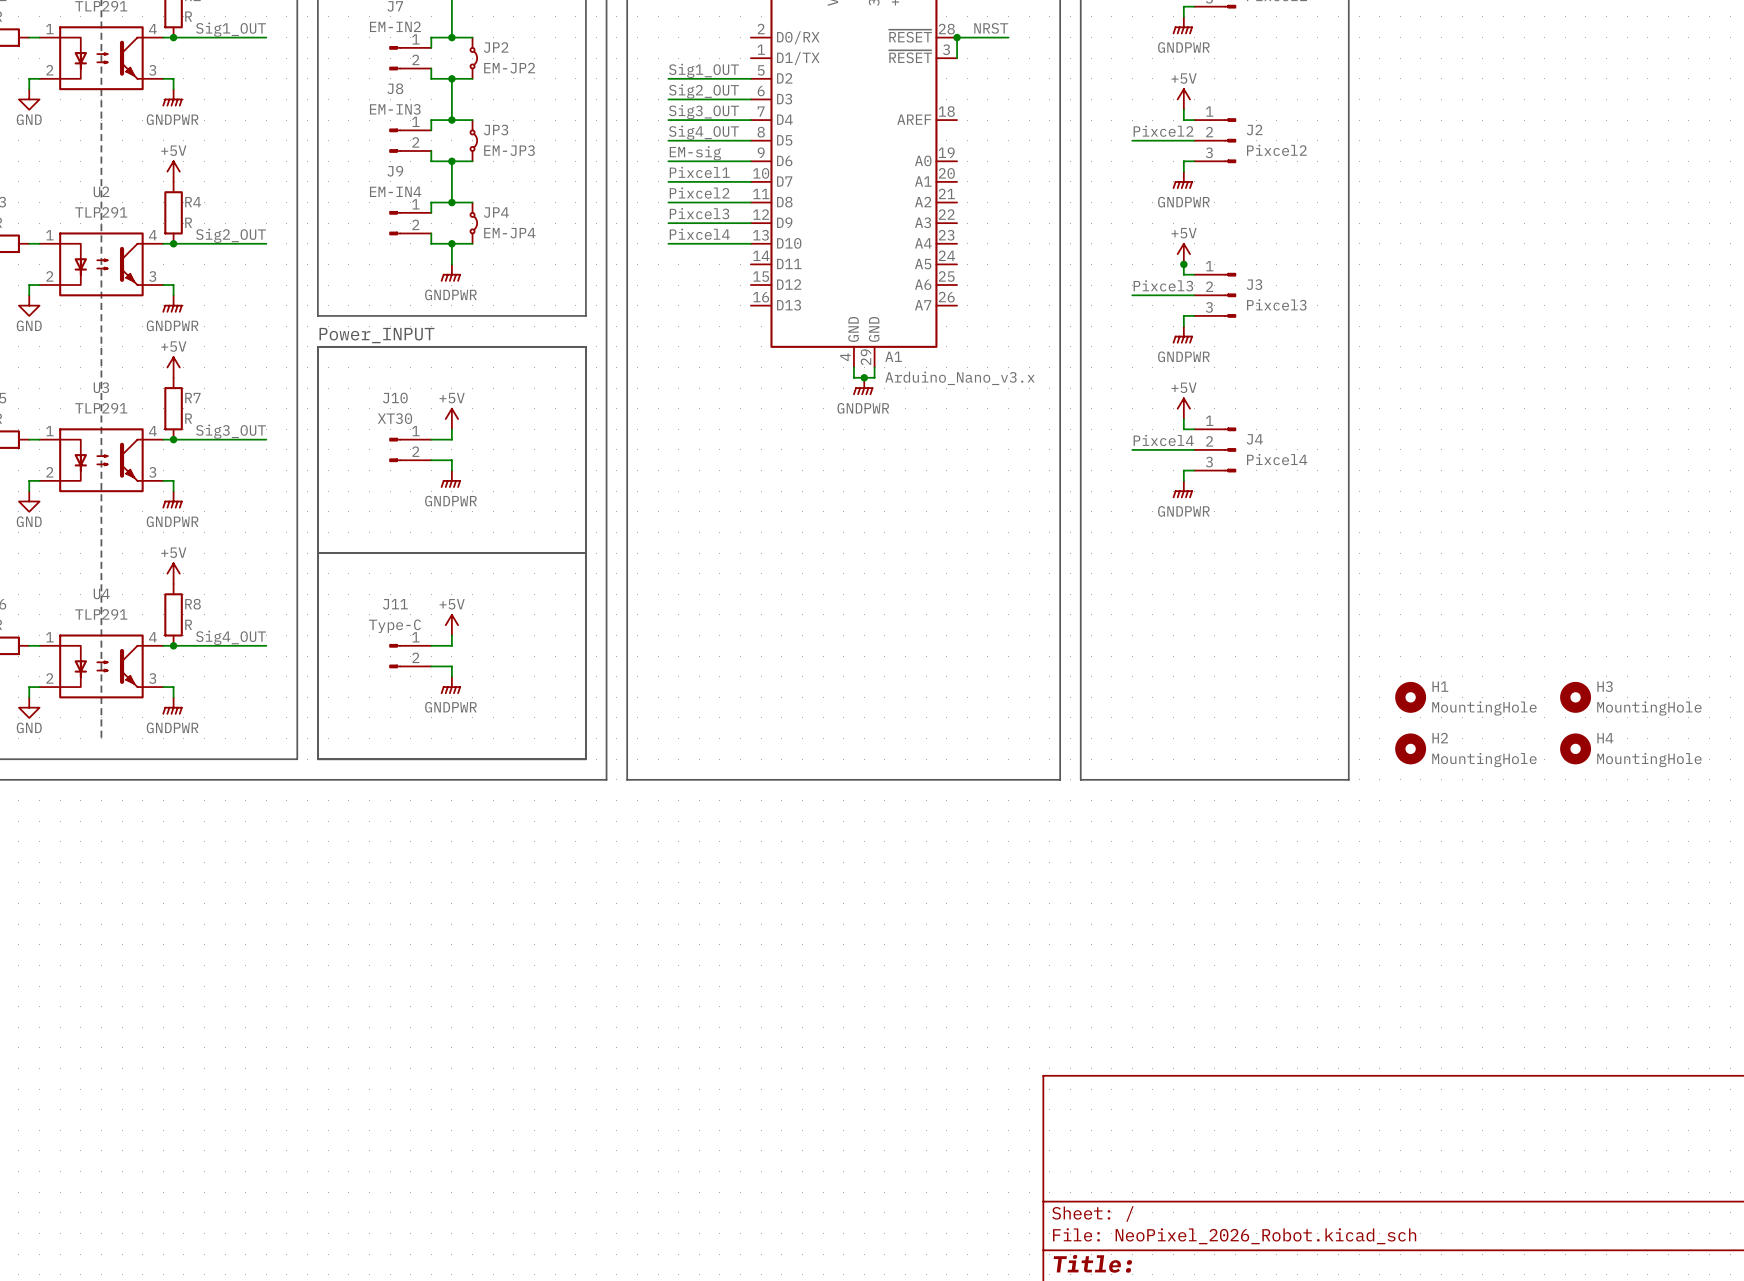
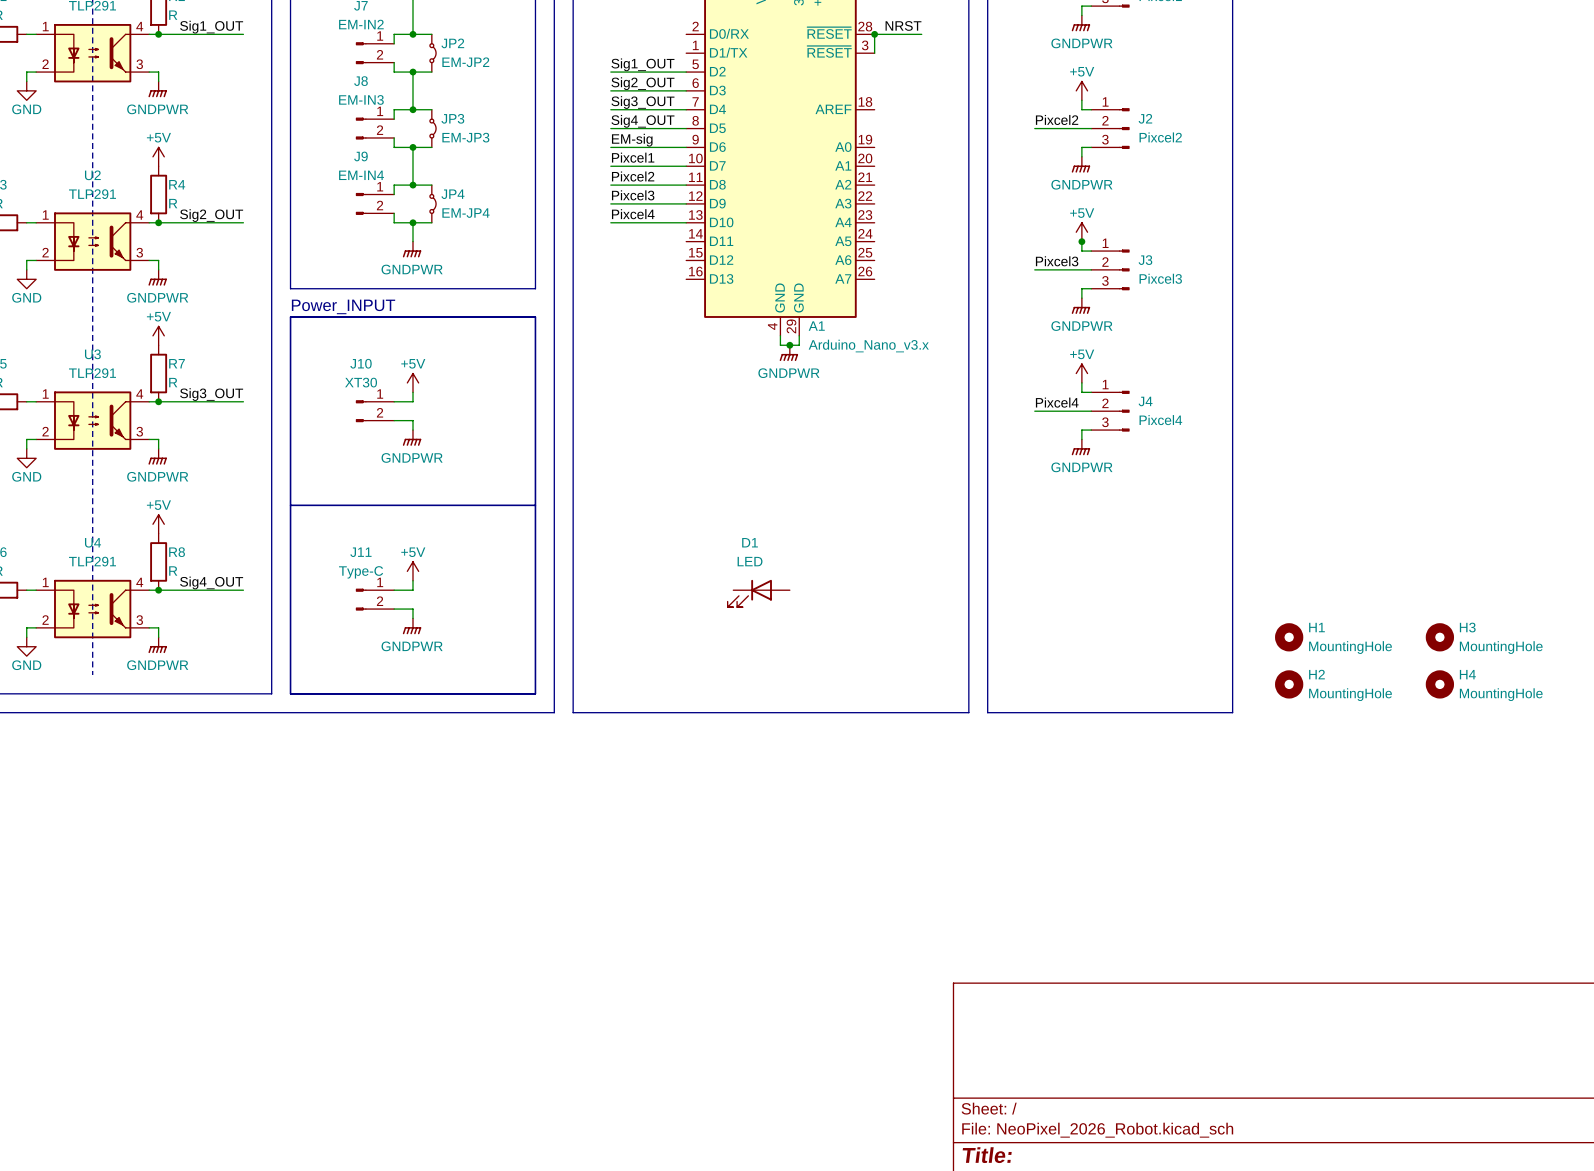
D1: none -> LED (758, 593)

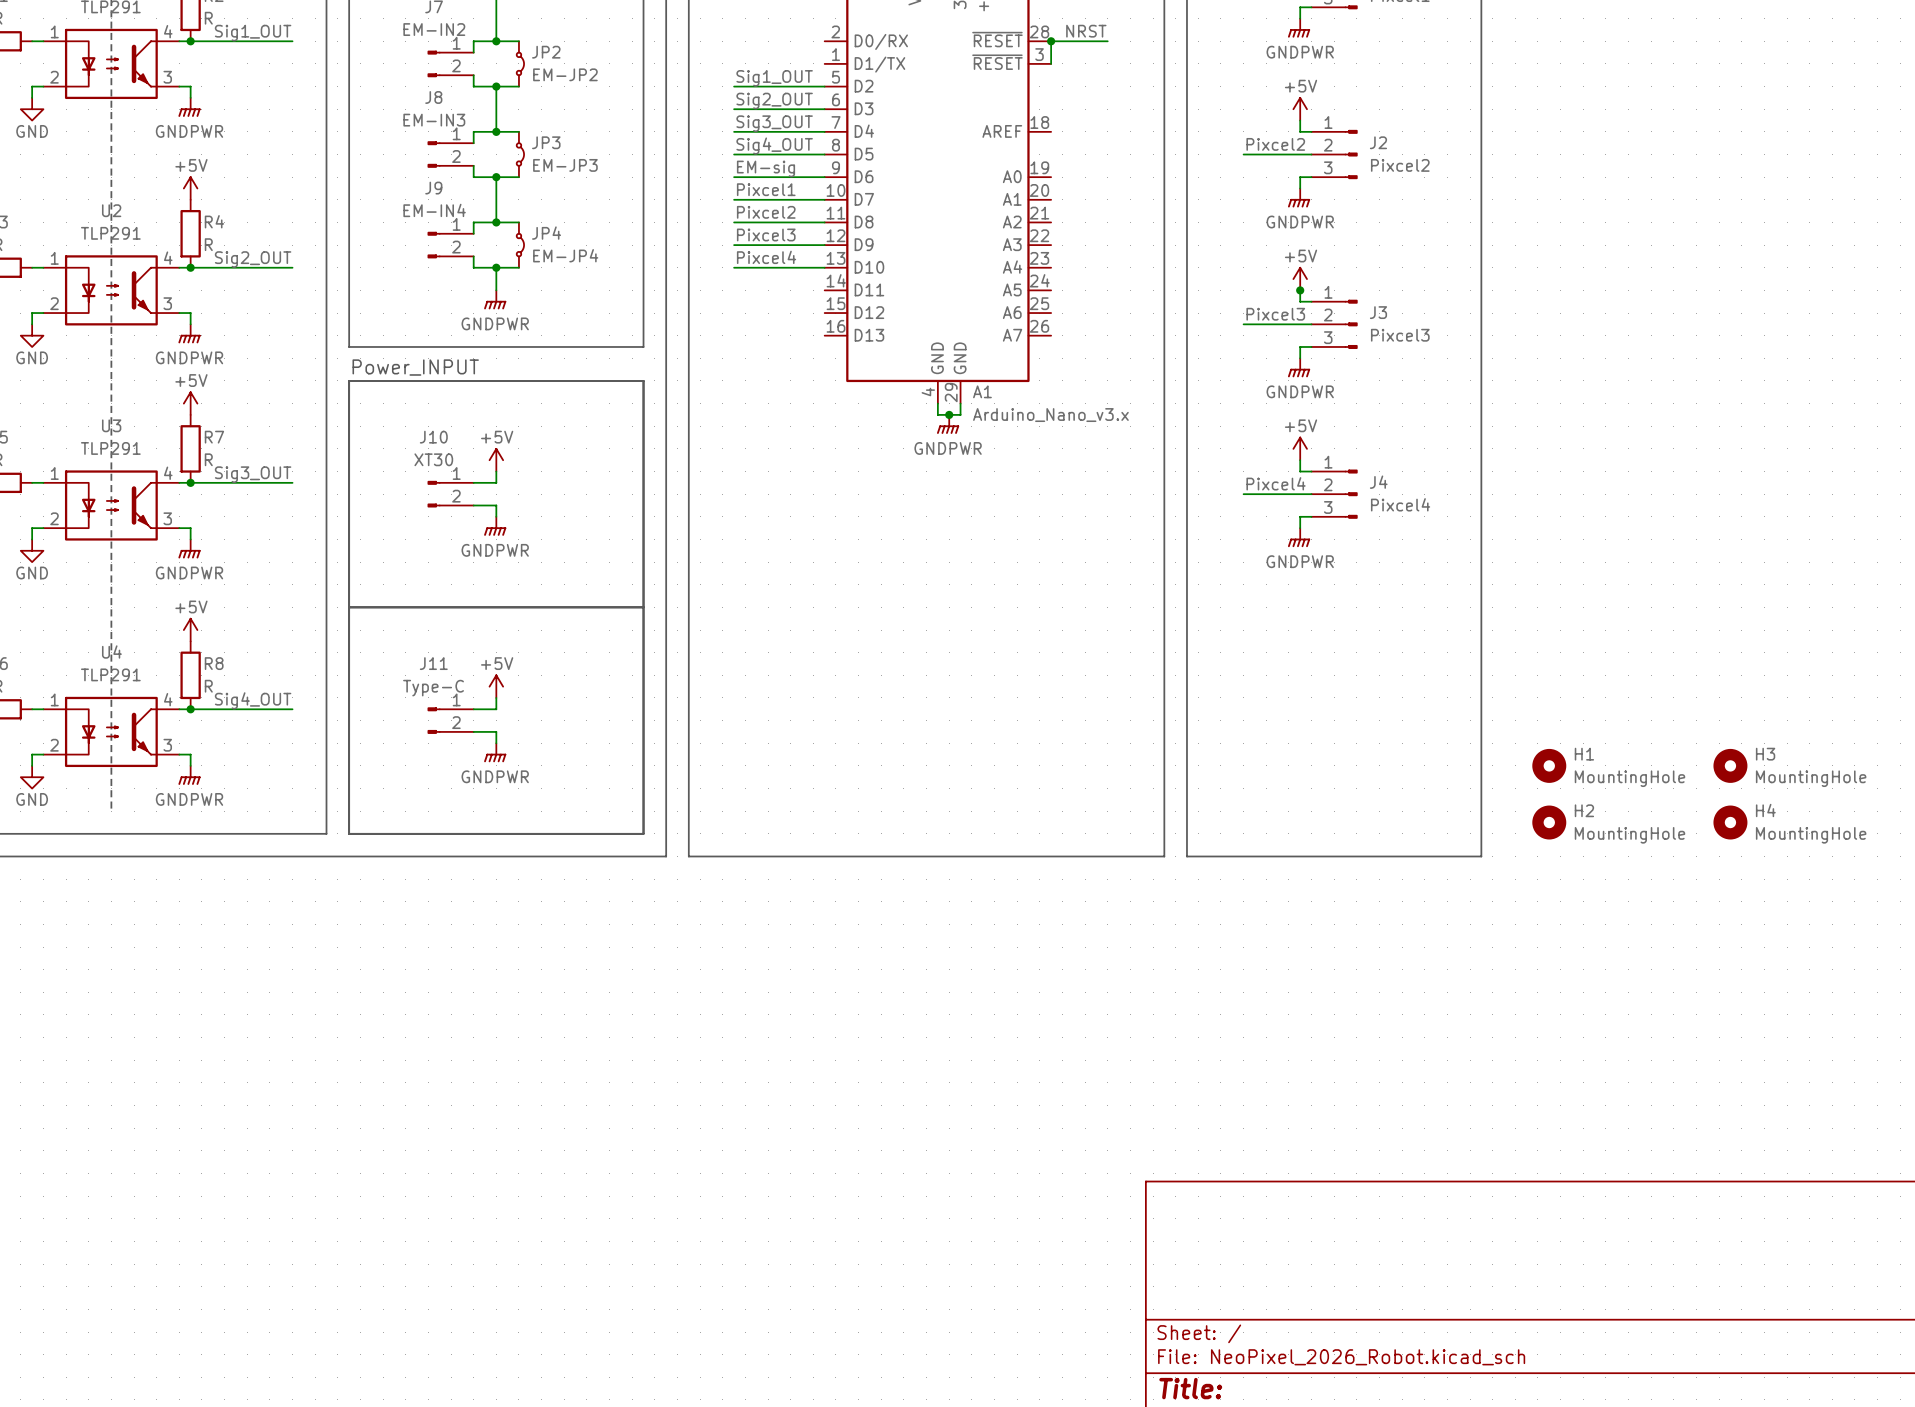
D1: LED (758, 593) -> none

